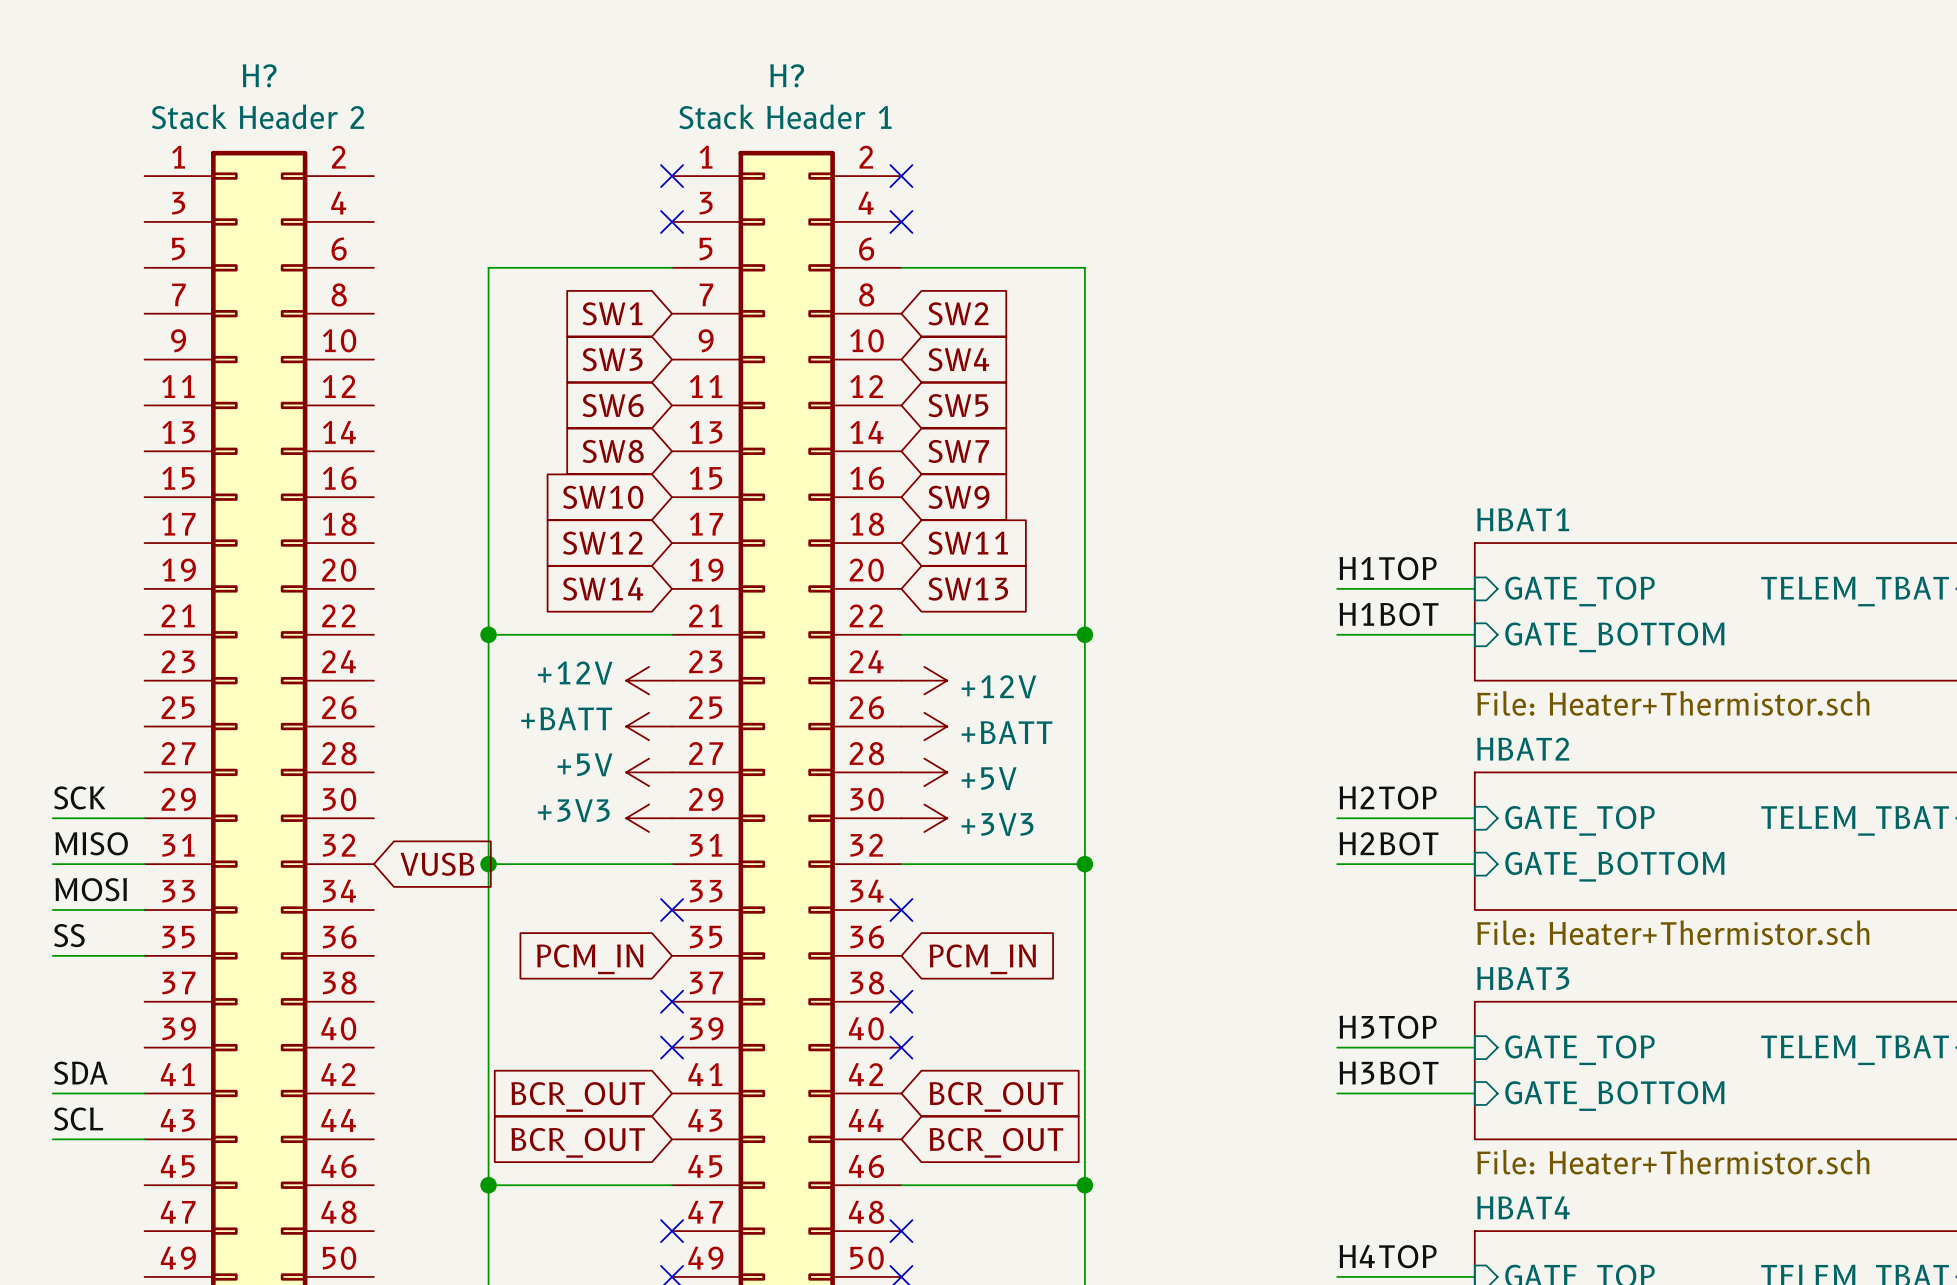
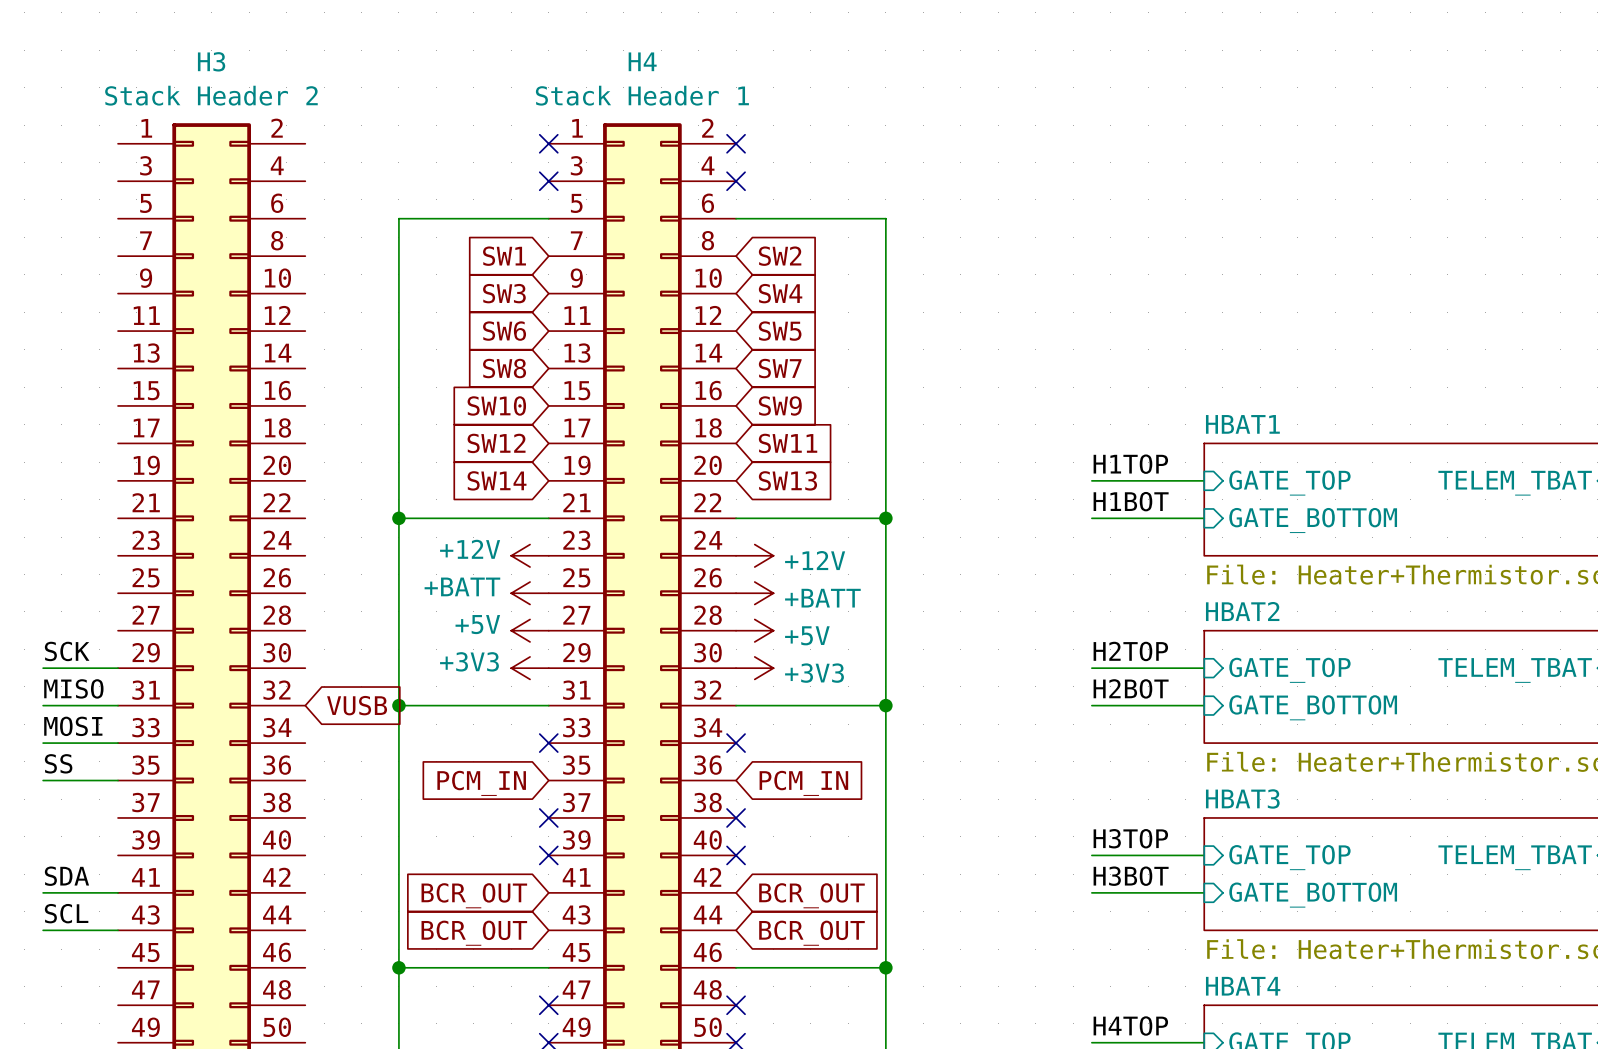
H? name: H? (259, 75) -> H3 (211, 61)
H? name: H? (787, 75) -> H4 (642, 61)

